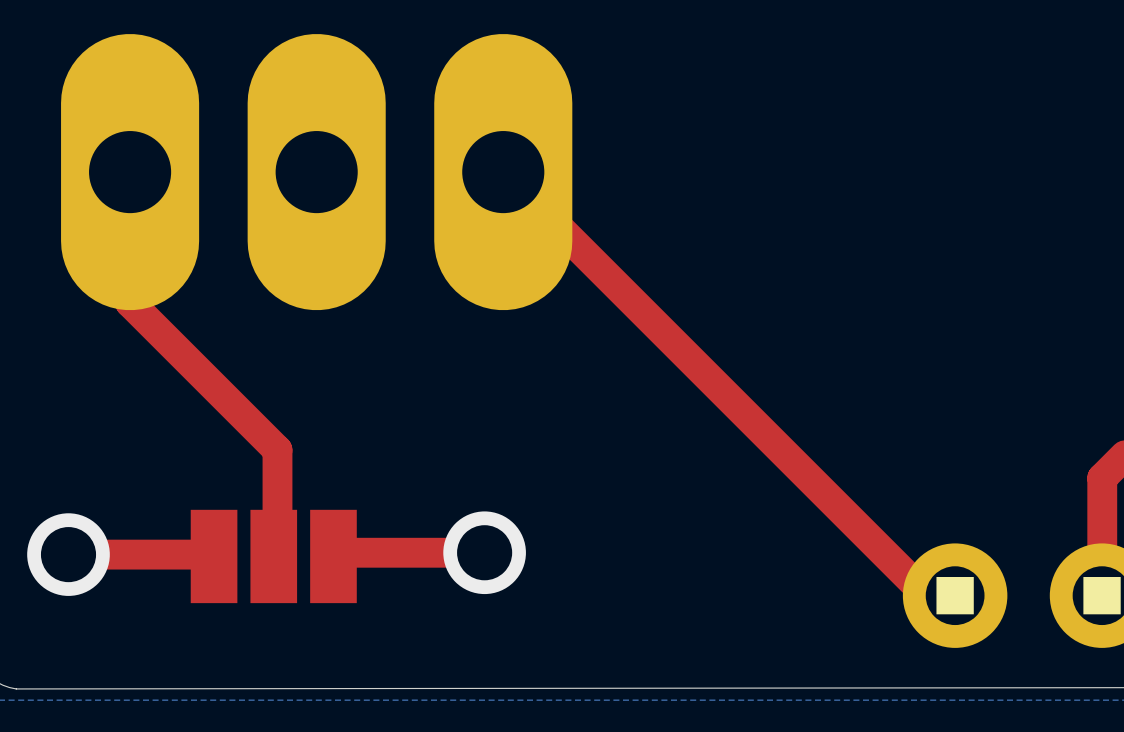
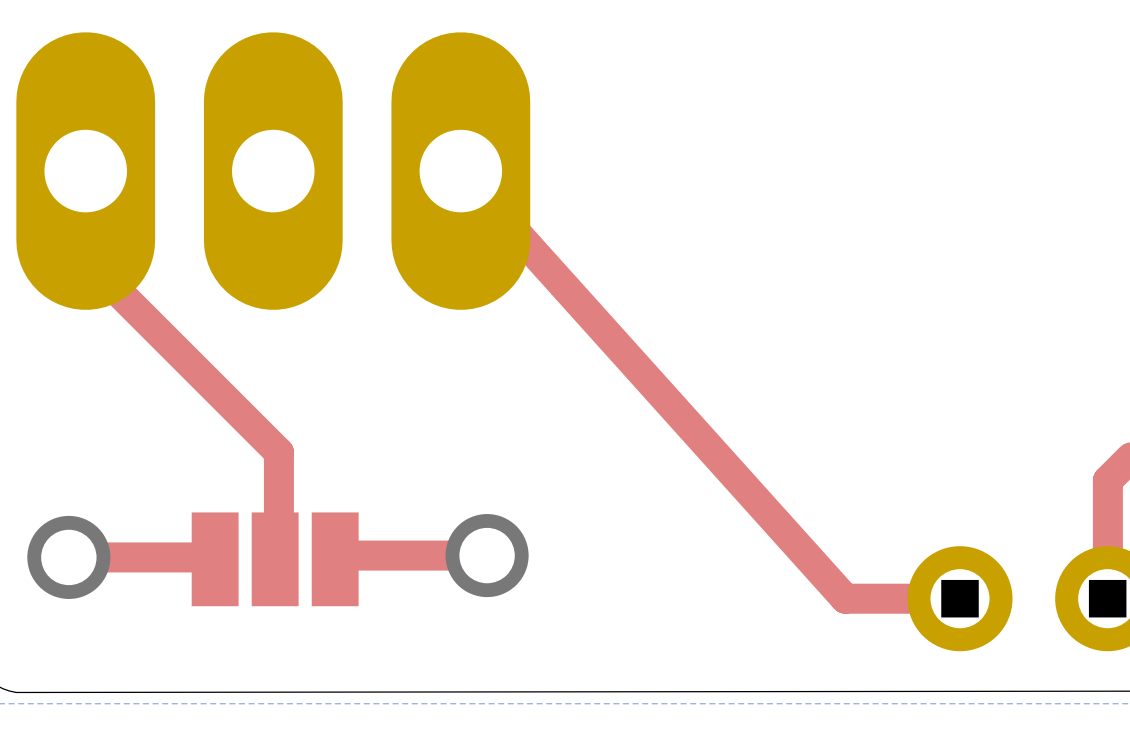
part position: (316, 172) -> (273, 171)
top track: (503, 172) (926, 595) -> (460, 171) (845, 598) (931, 598)

